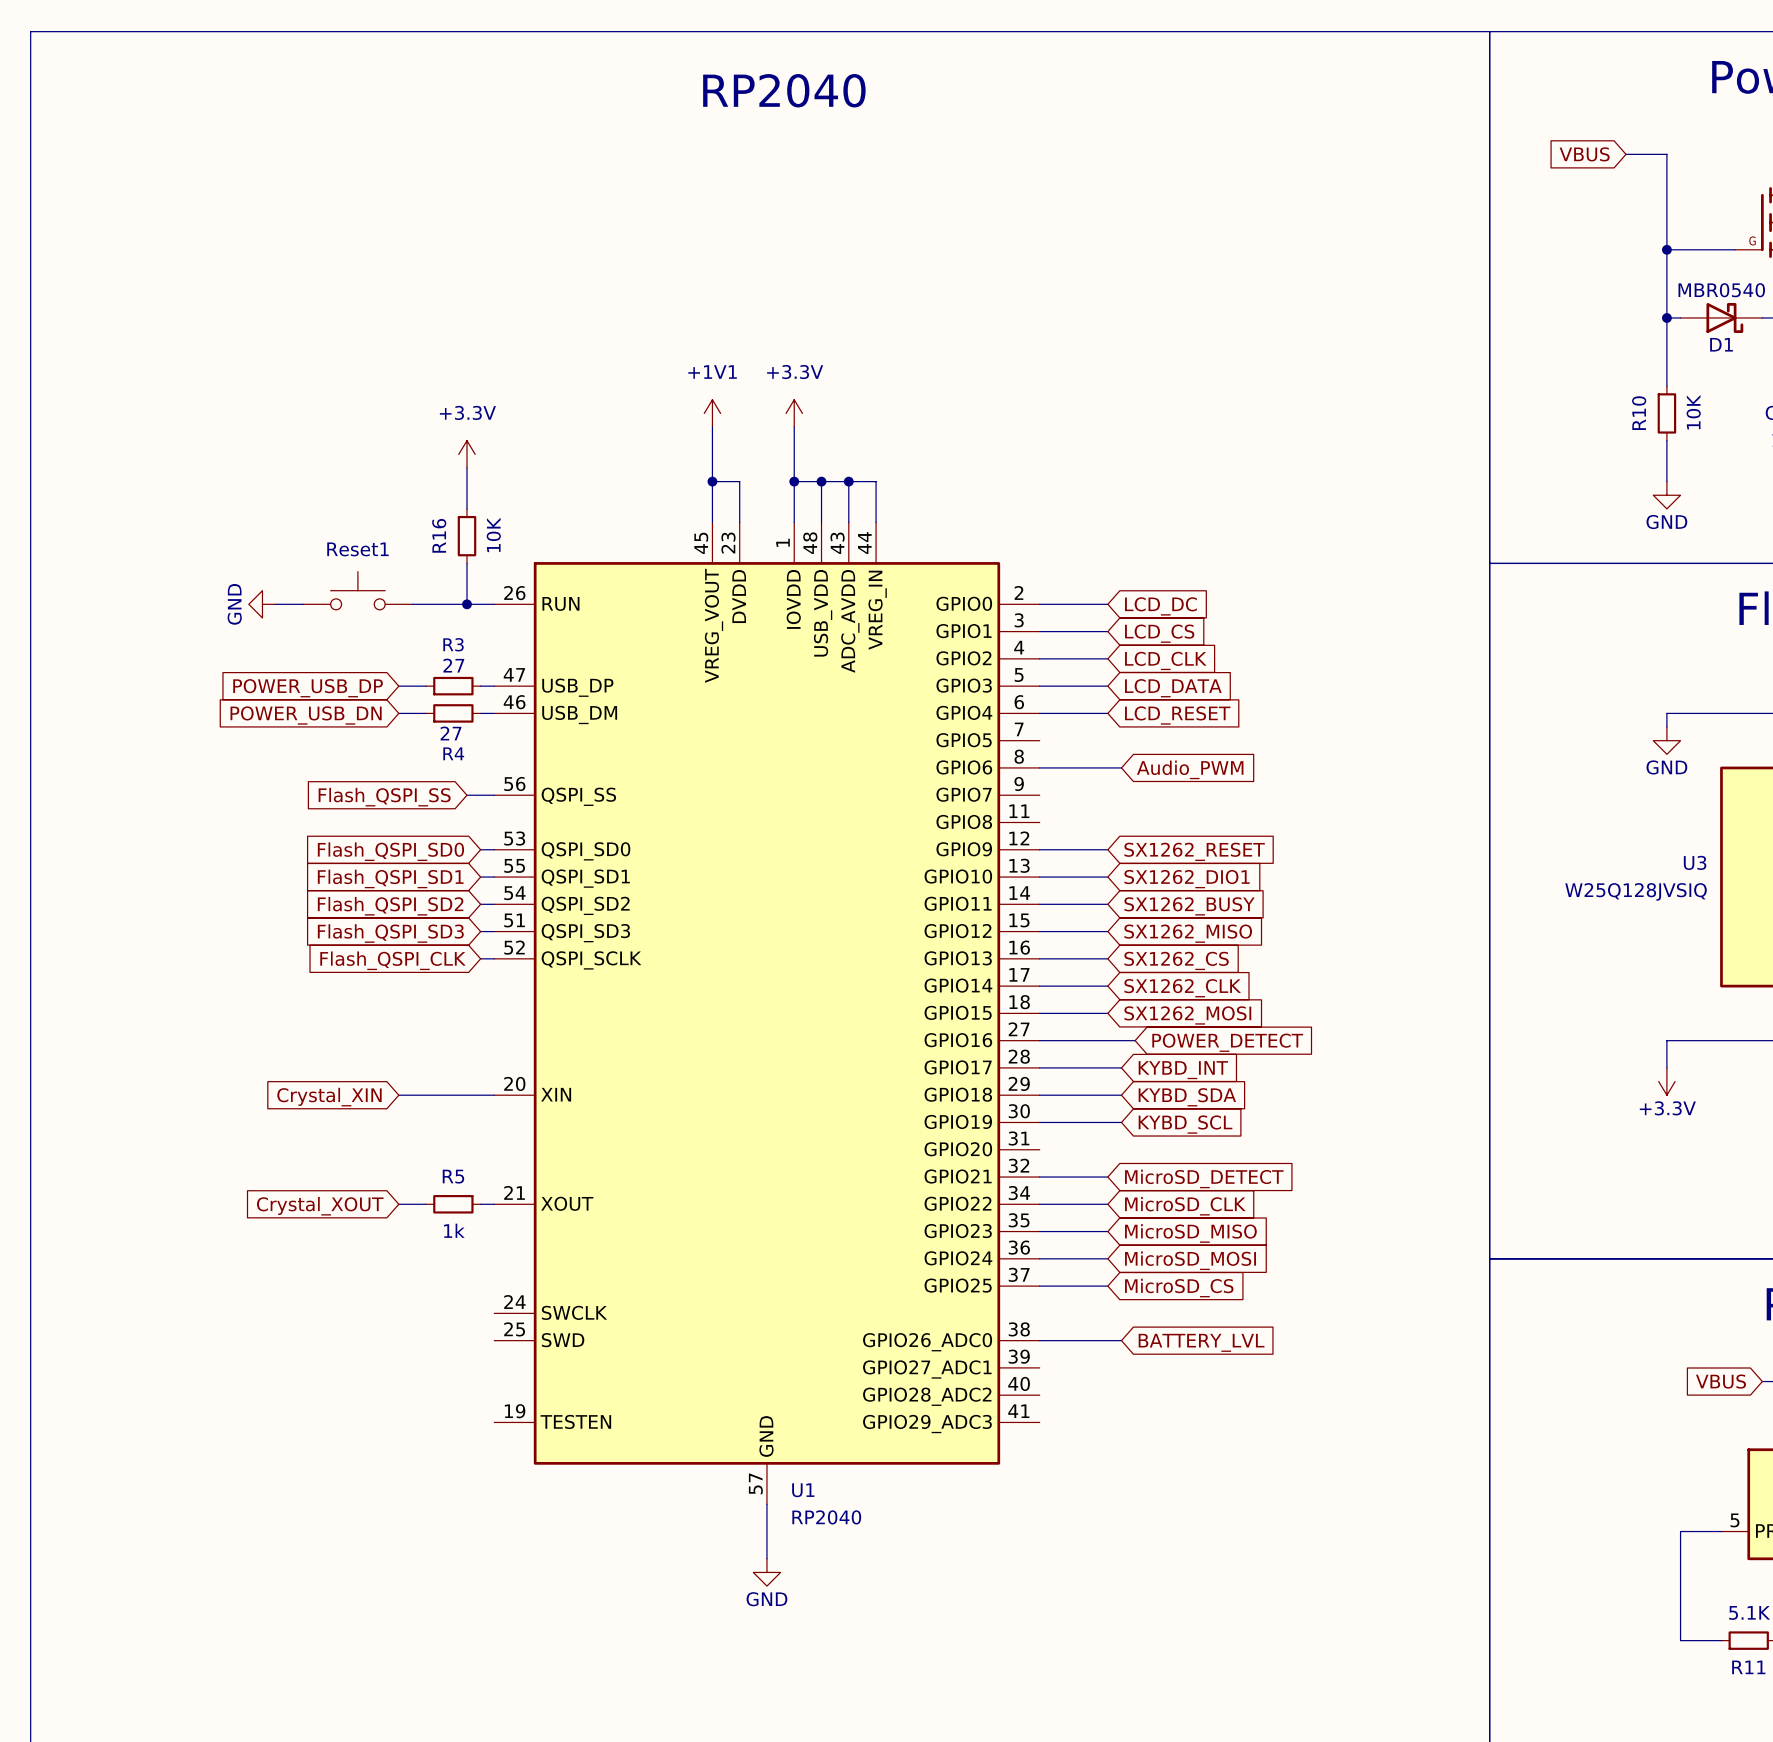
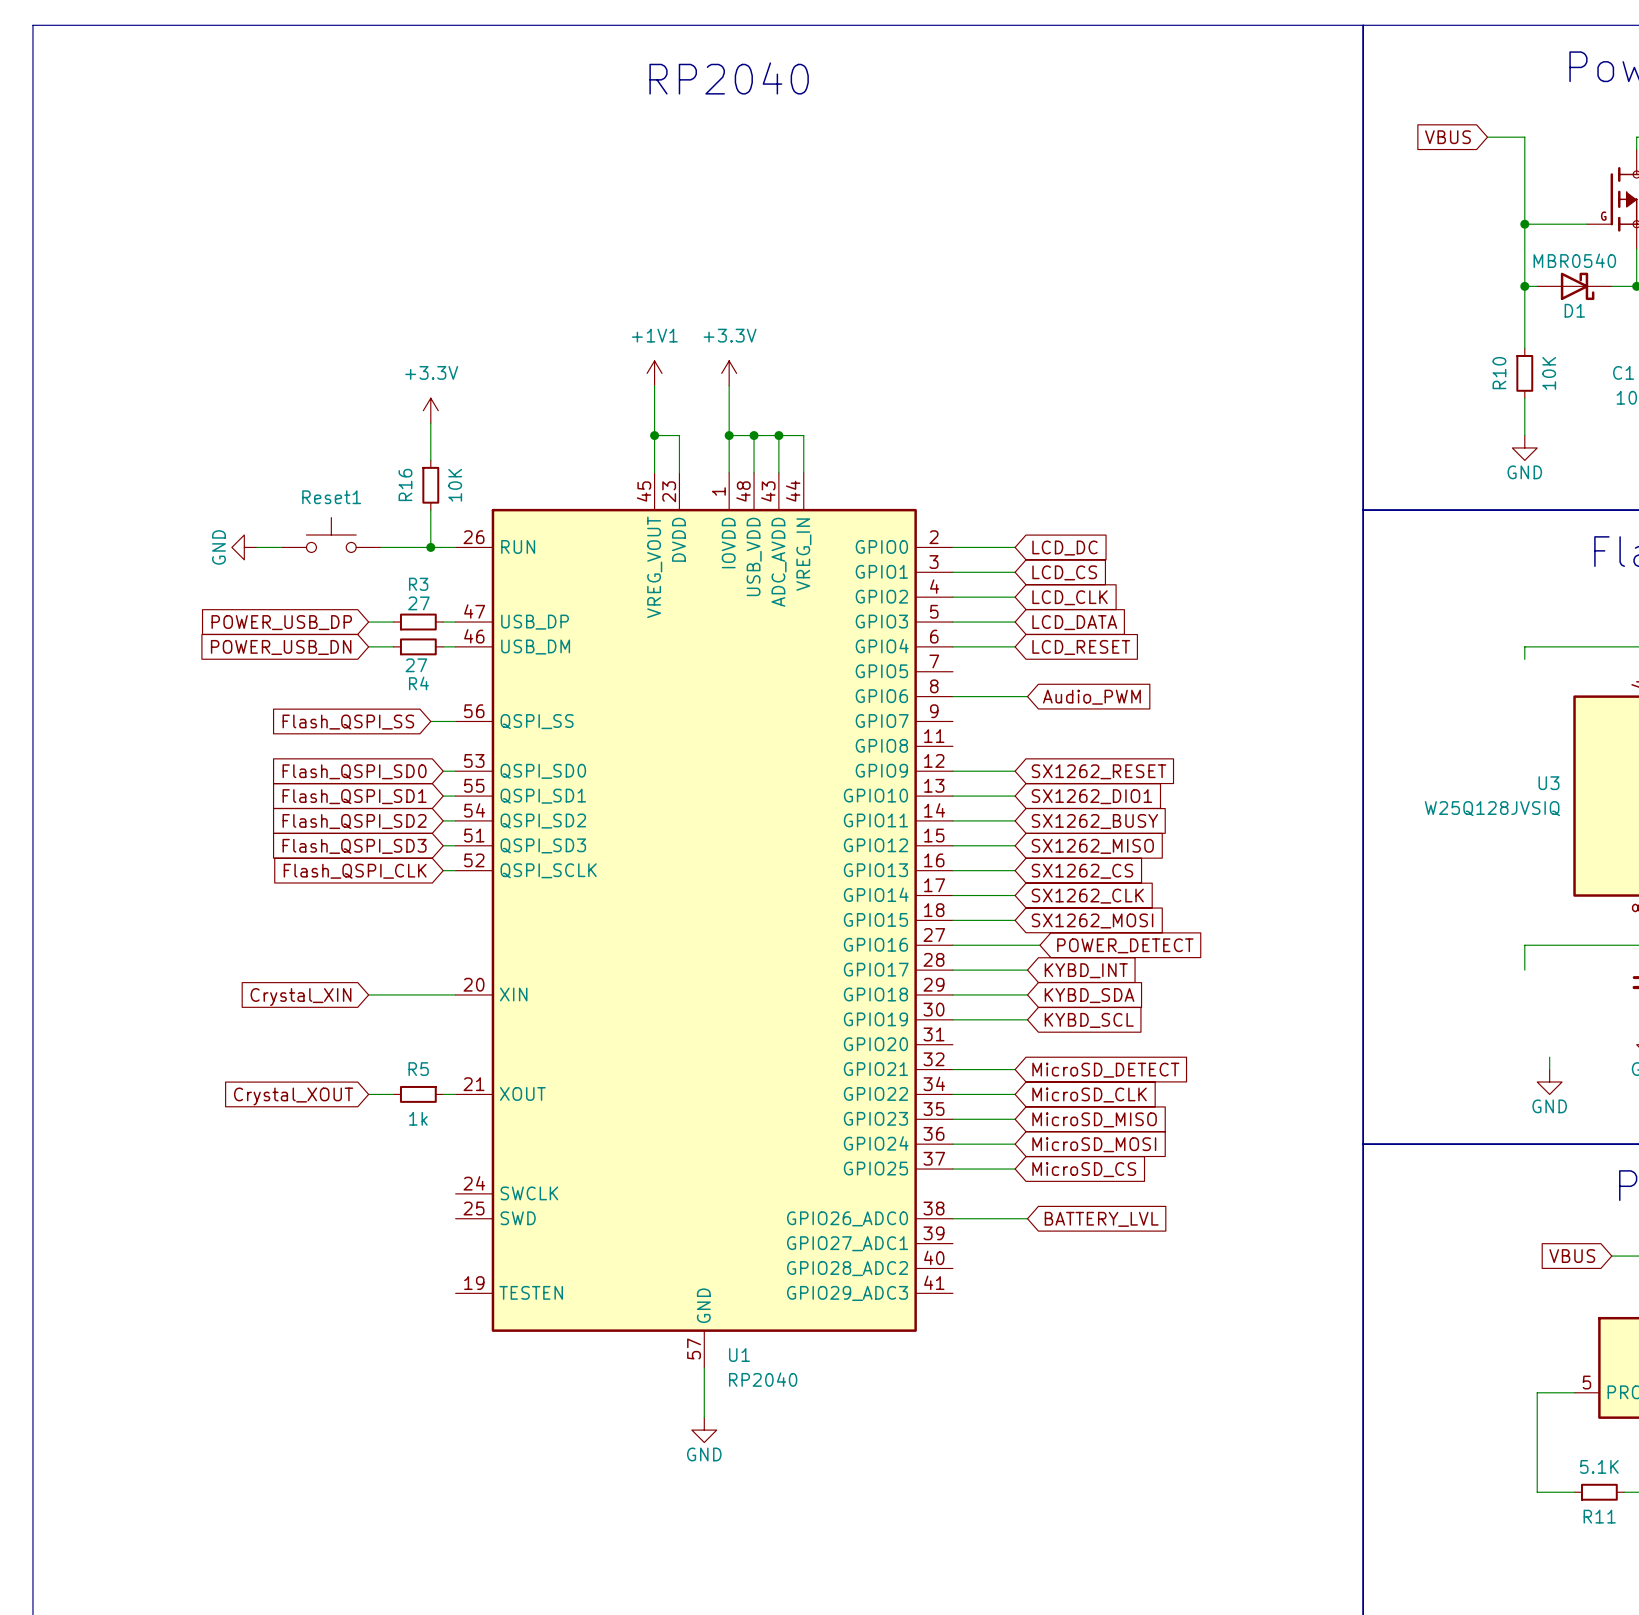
power symbol: GND (1666, 740) -> none
power symbol: +3.3V (1666, 1081) -> none
wire: none -> (1549, 1057) (1549, 1069)
power symbol: none -> GND (1549, 1081)

